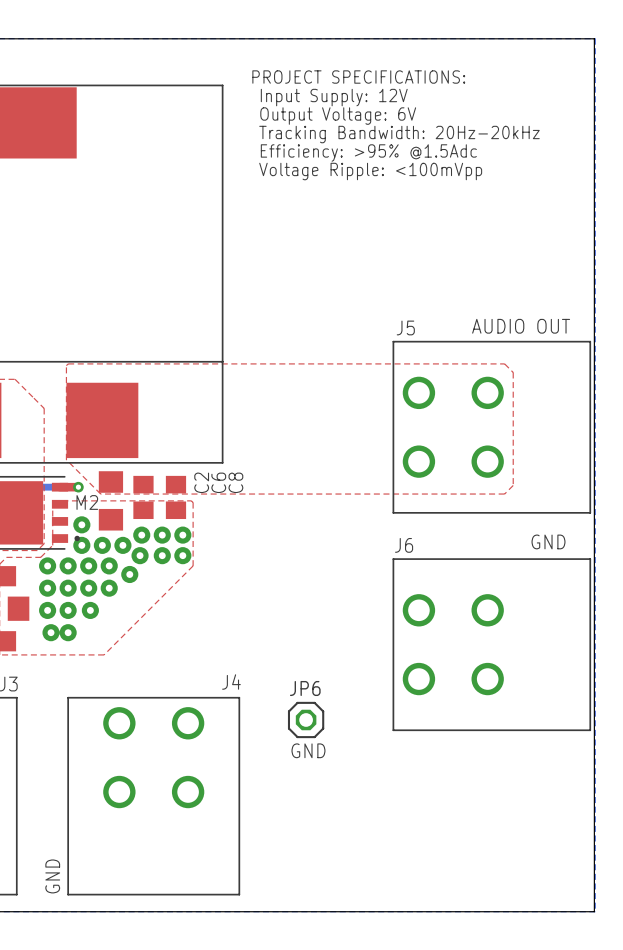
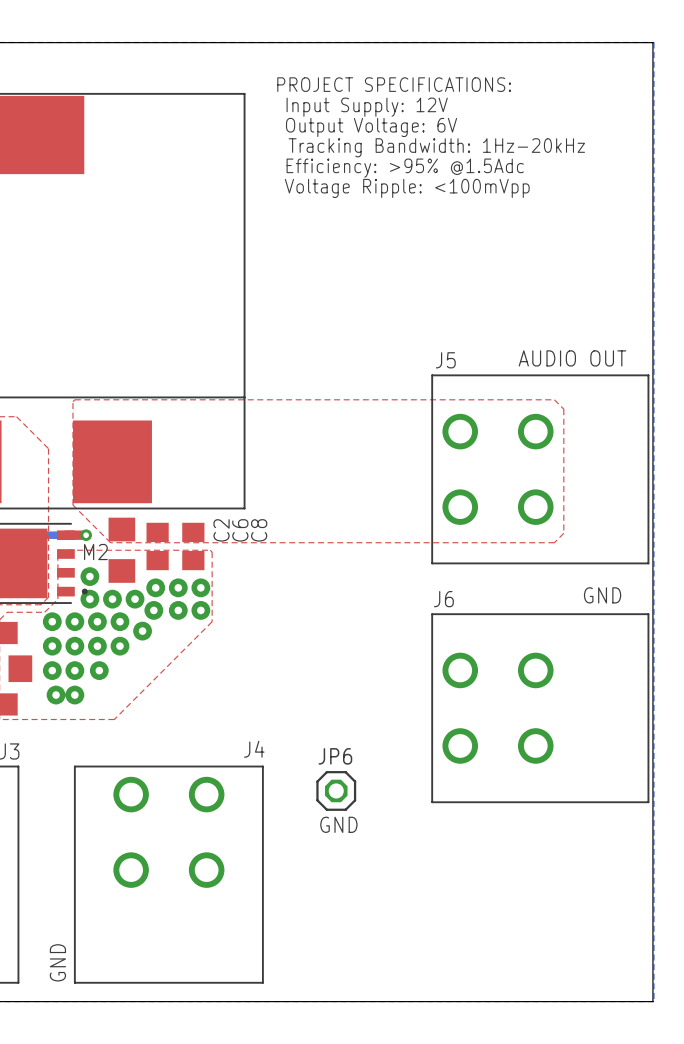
text: Tracking Bandwidth: 20Hz-20kHz (399, 134) -> Tracking Bandwidth: 1Hz-20kHz (436, 147)

